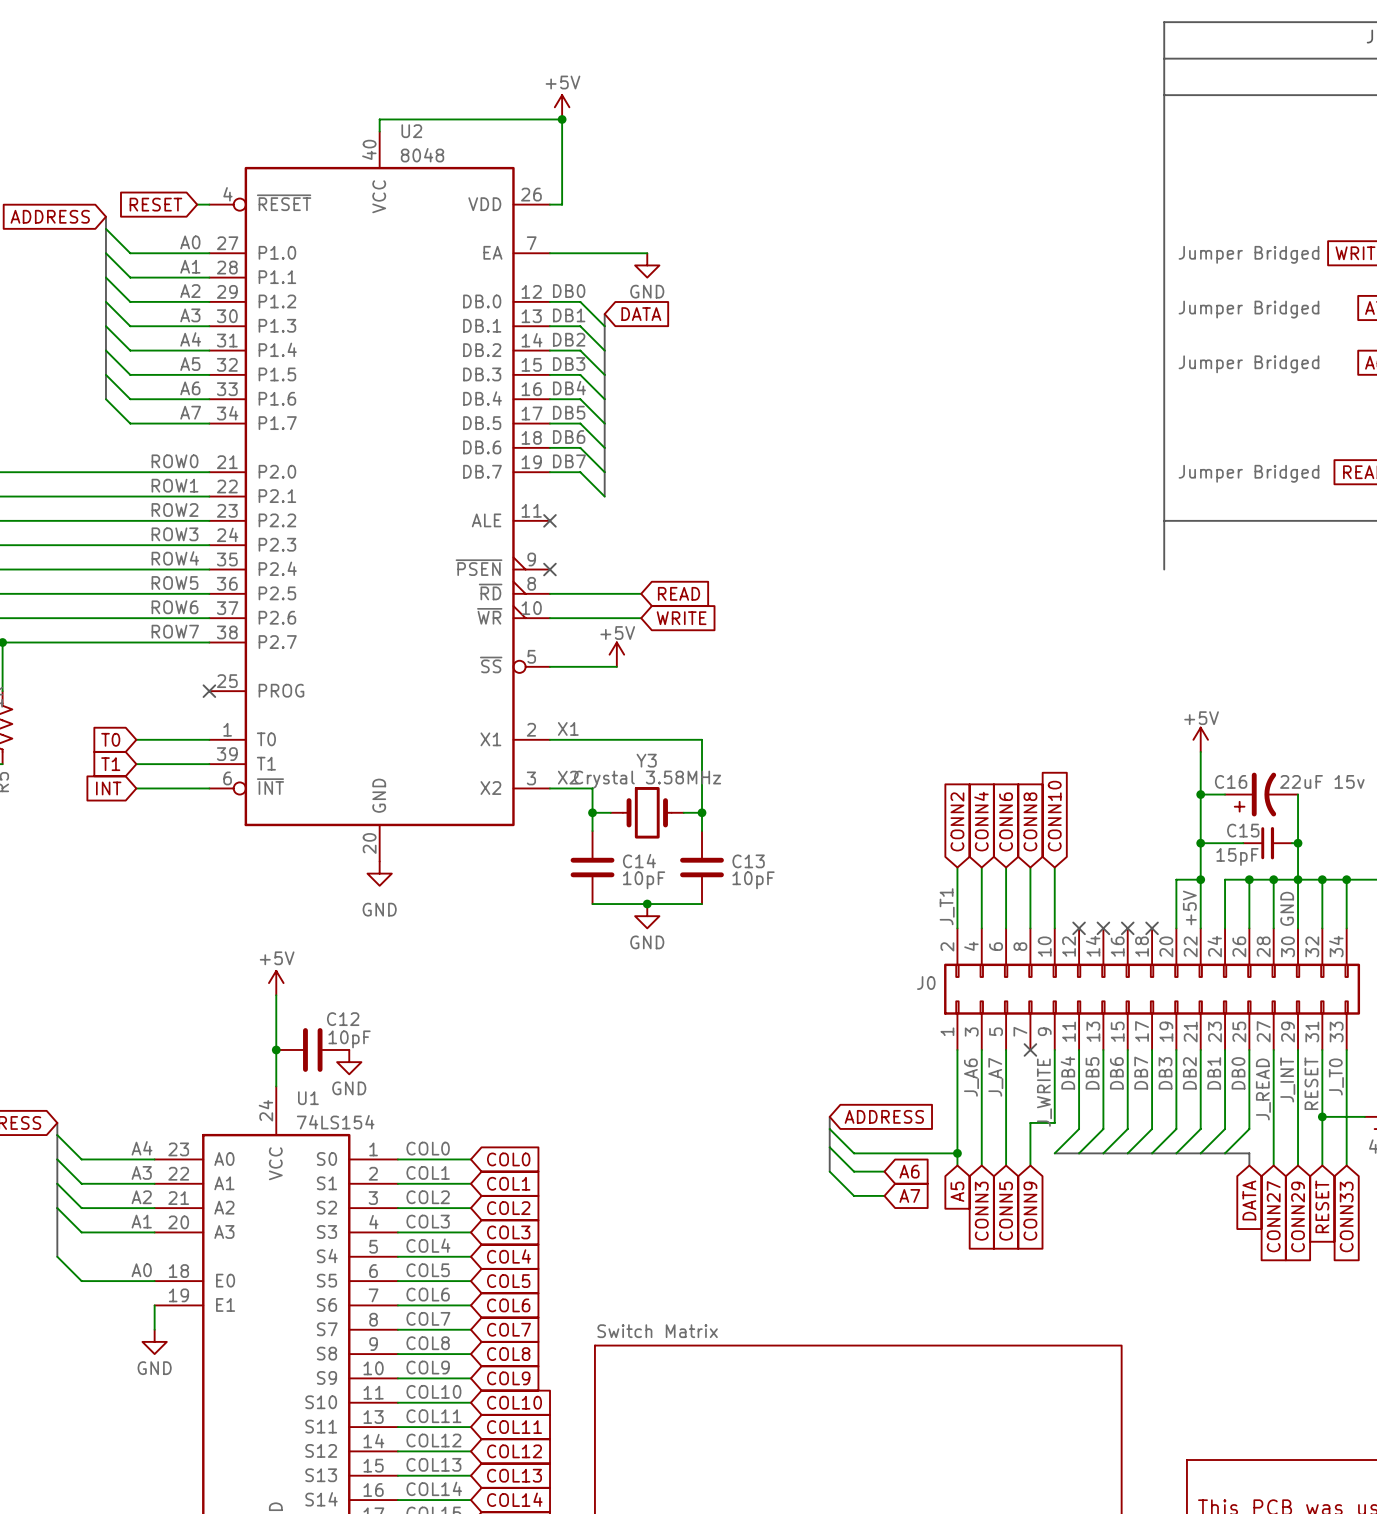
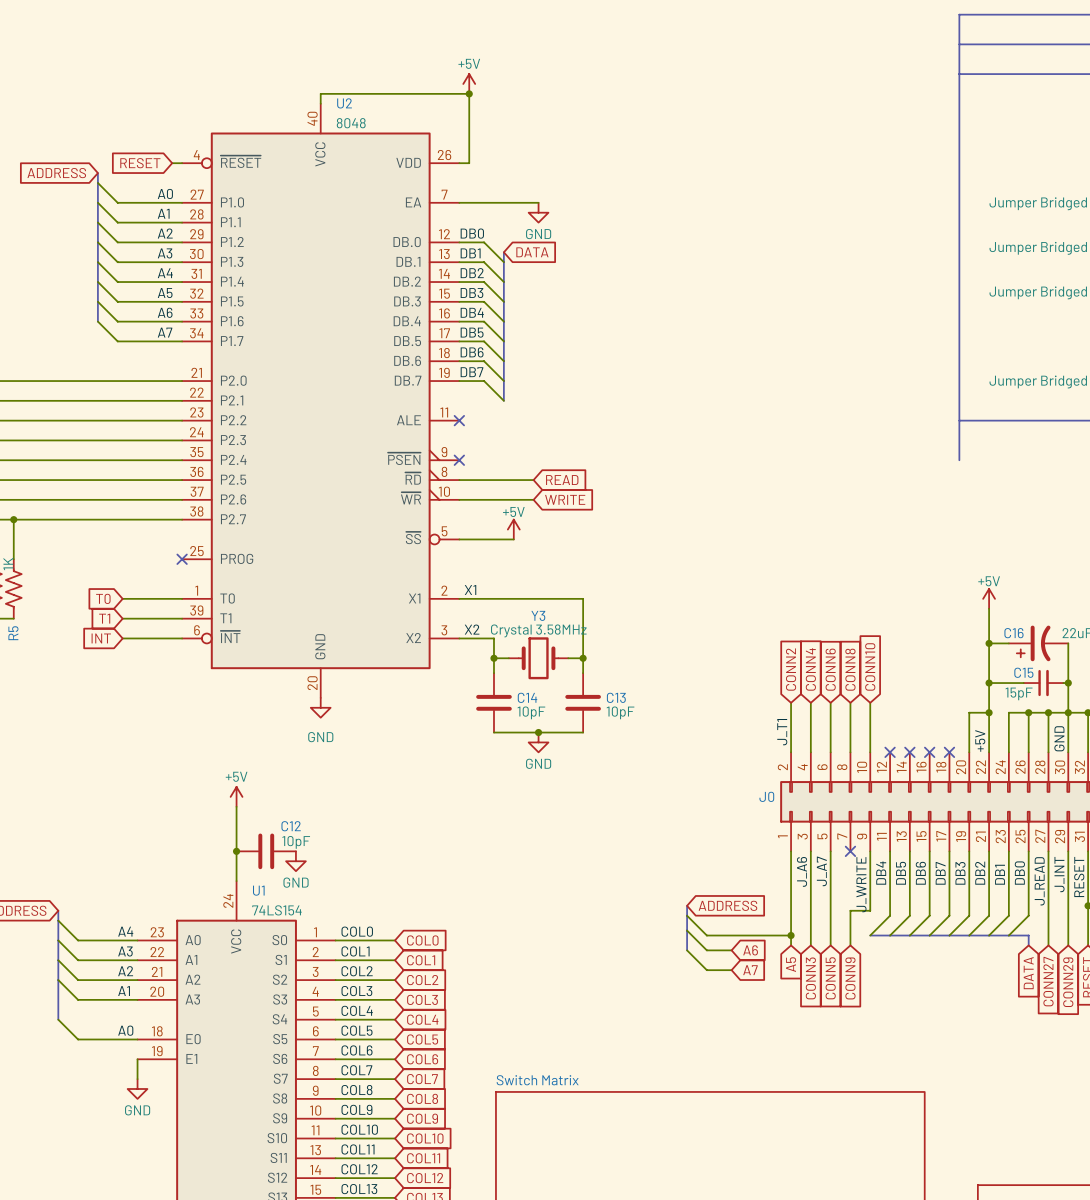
label: ROW0 (175, 461) -> none
label: ROW1 (175, 485) -> none
label: ROW2 (175, 510) -> none
label: ROW3 (175, 534) -> none
label: ROW4 (175, 558) -> none
label: ROW5 (175, 582) -> none
label: ROW6 (175, 607) -> none
label: ROW7 (175, 631) -> none

